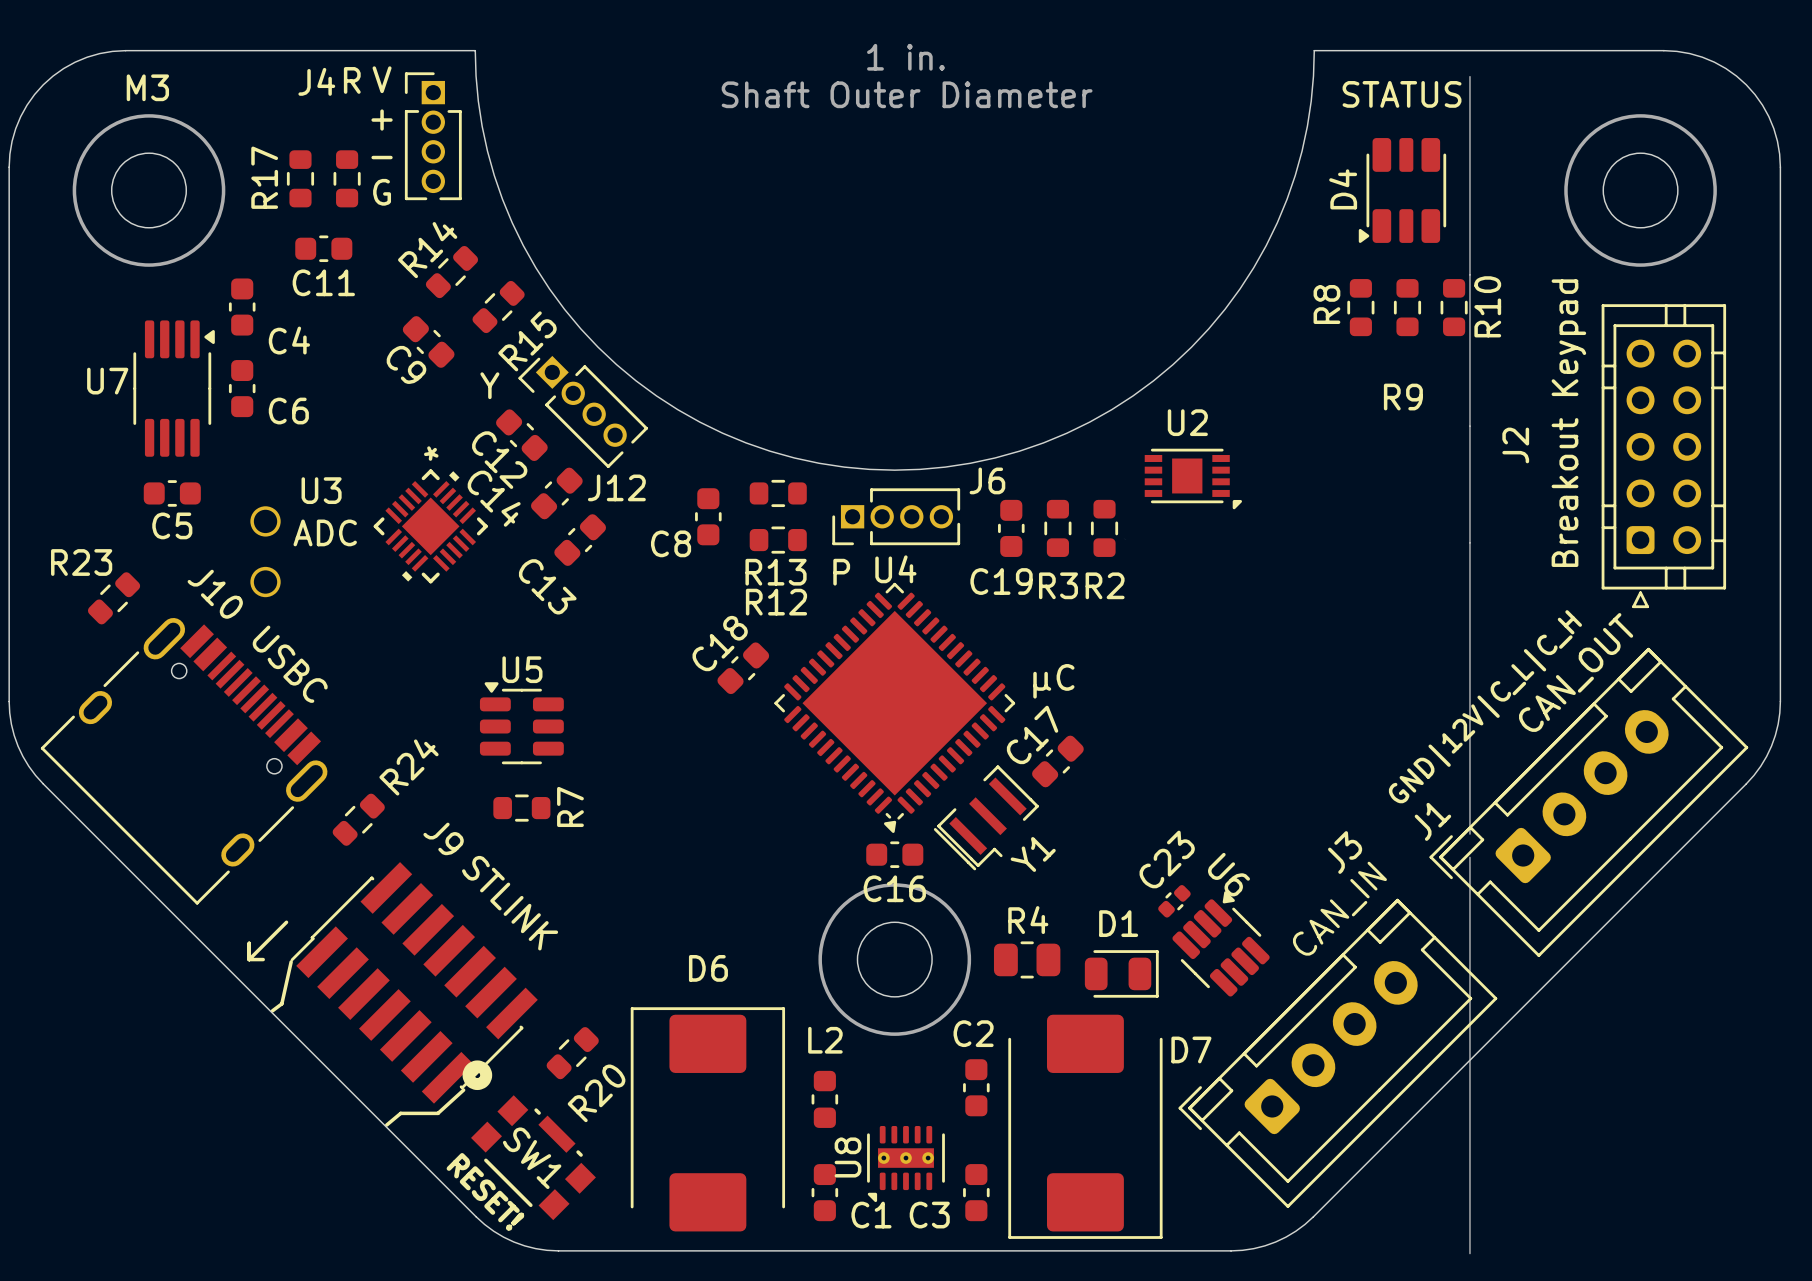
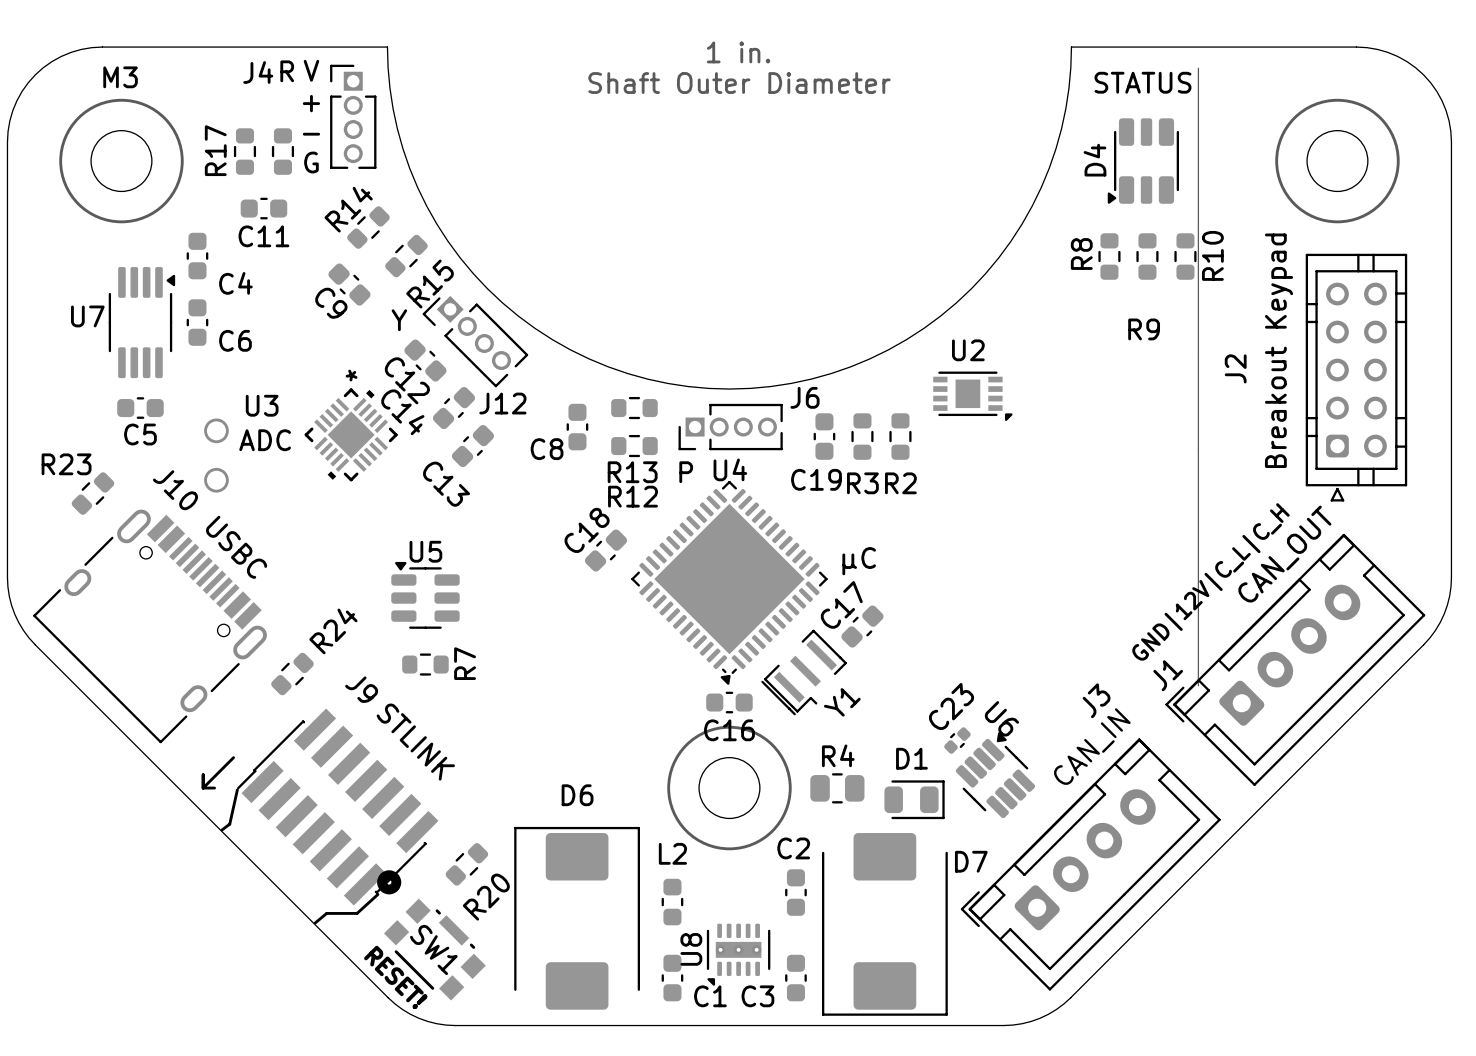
line: (1469, 857) (1469, 1253) -> none

